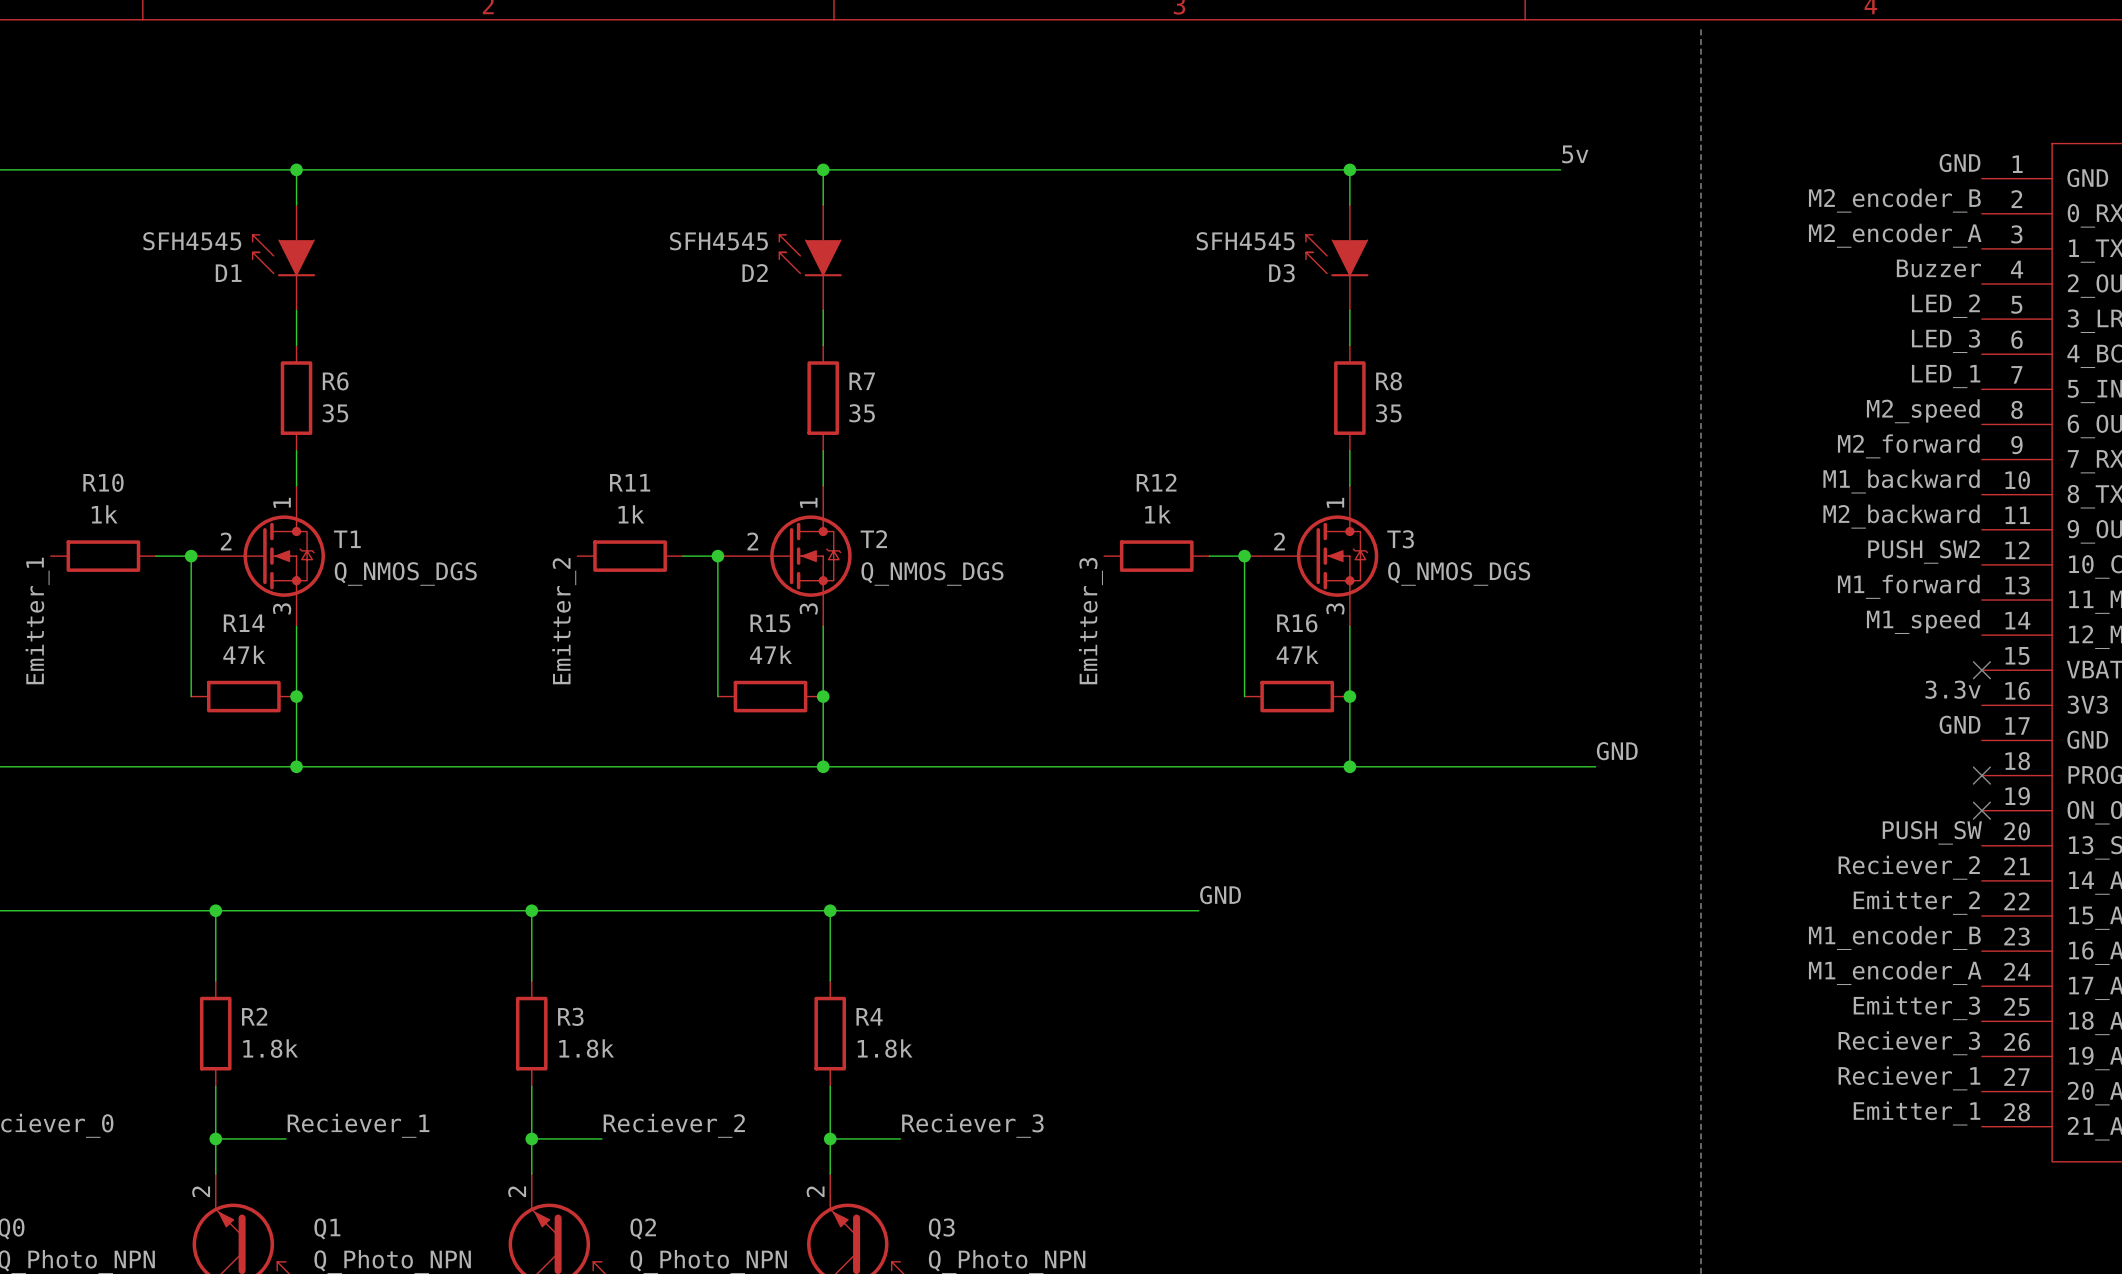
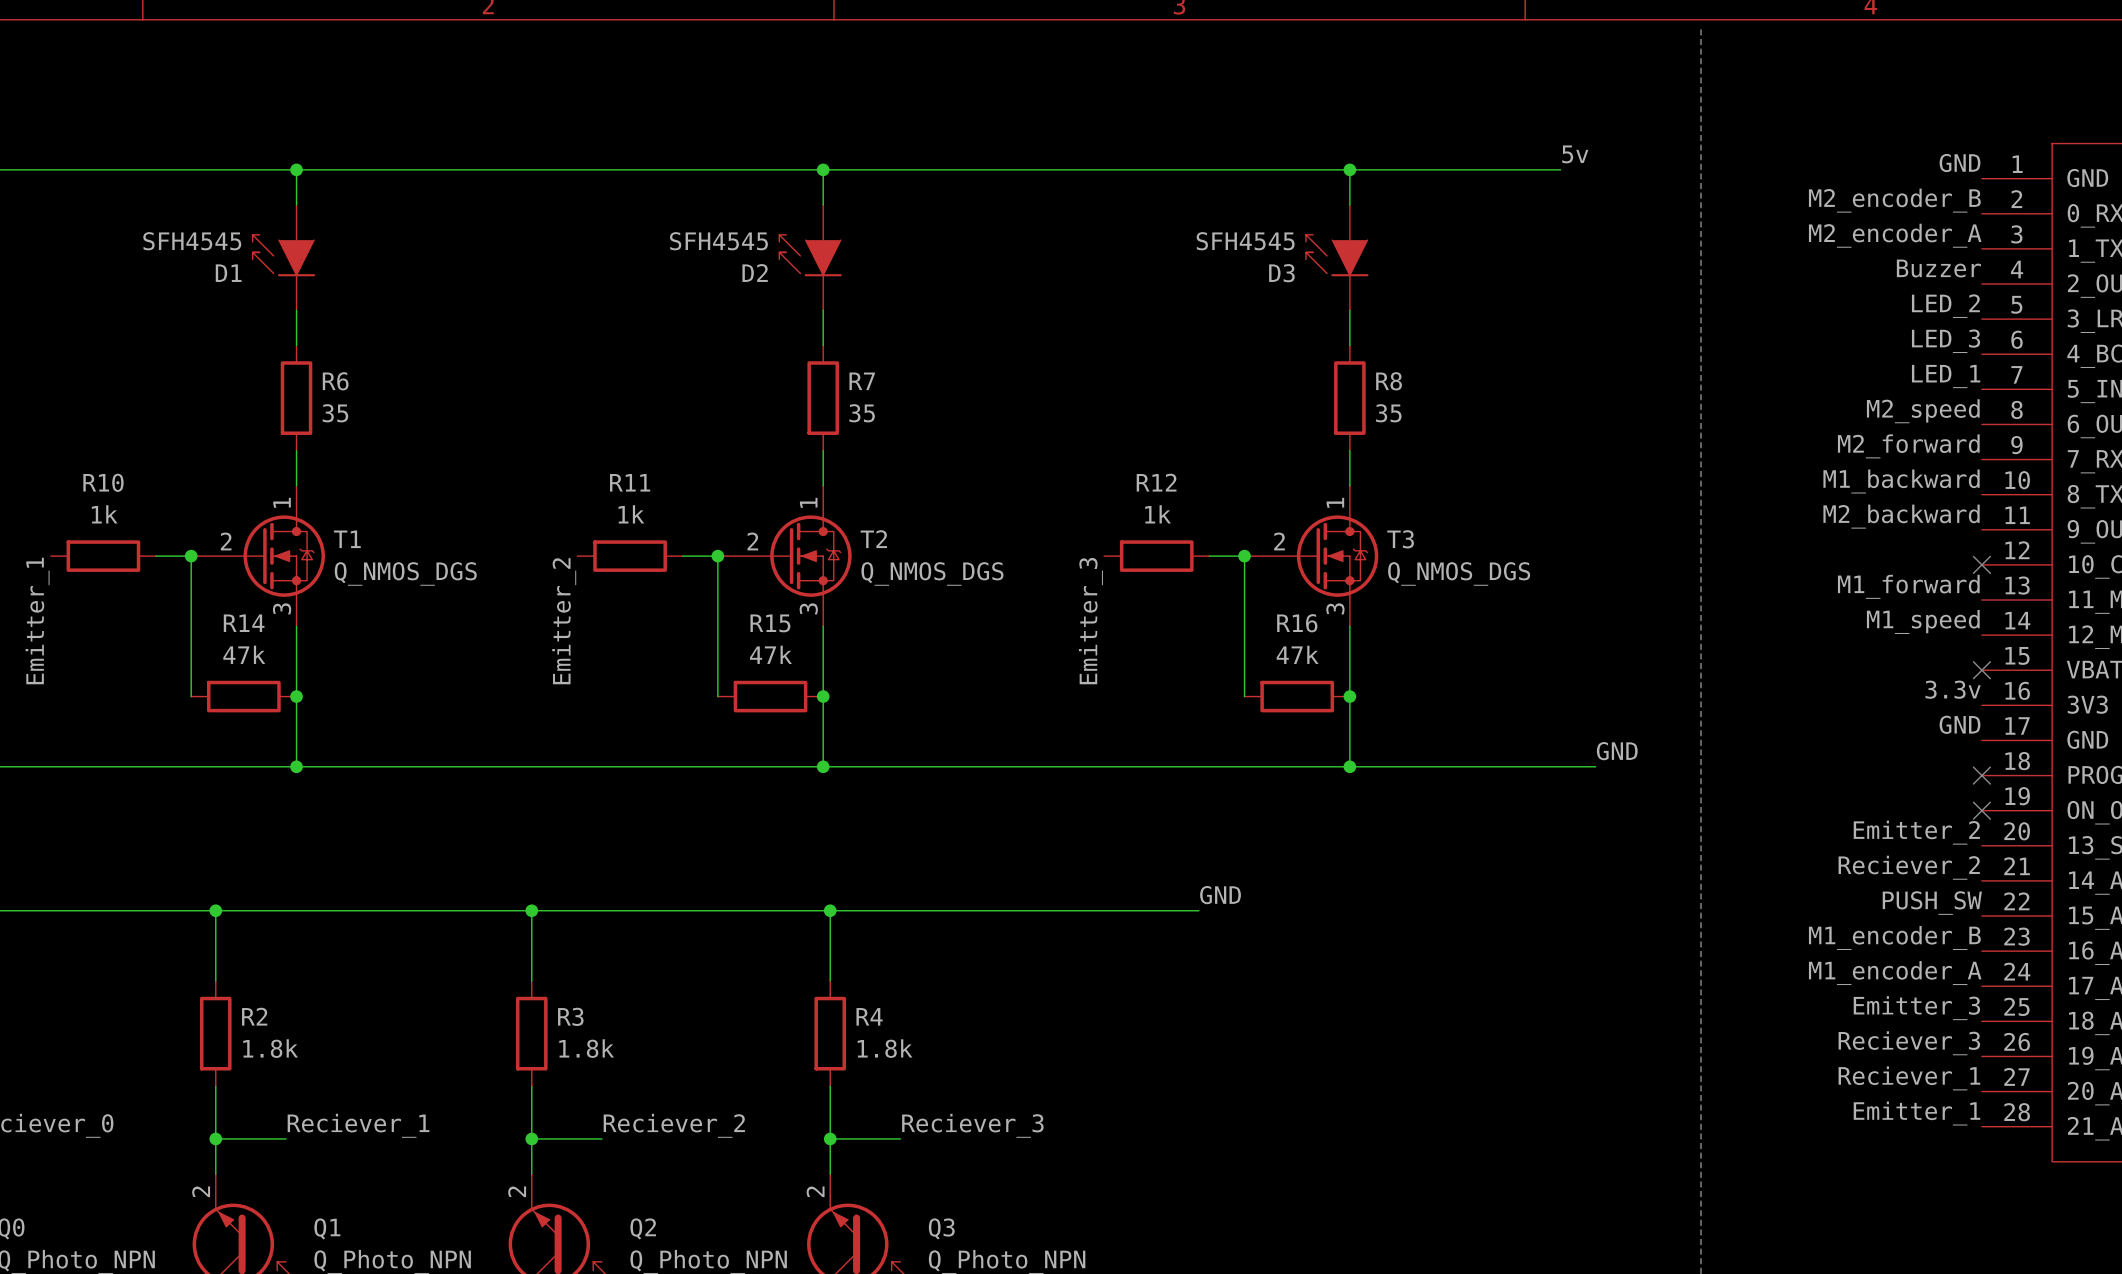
label: PUSH_SW2 (1924, 551) -> none
no-connect mark: none -> (1981, 564)
label: PUSH_SW (1932, 832) -> Emitter_2 (1916, 832)
label: Emitter_2 (1916, 902) -> PUSH_SW (1932, 903)

